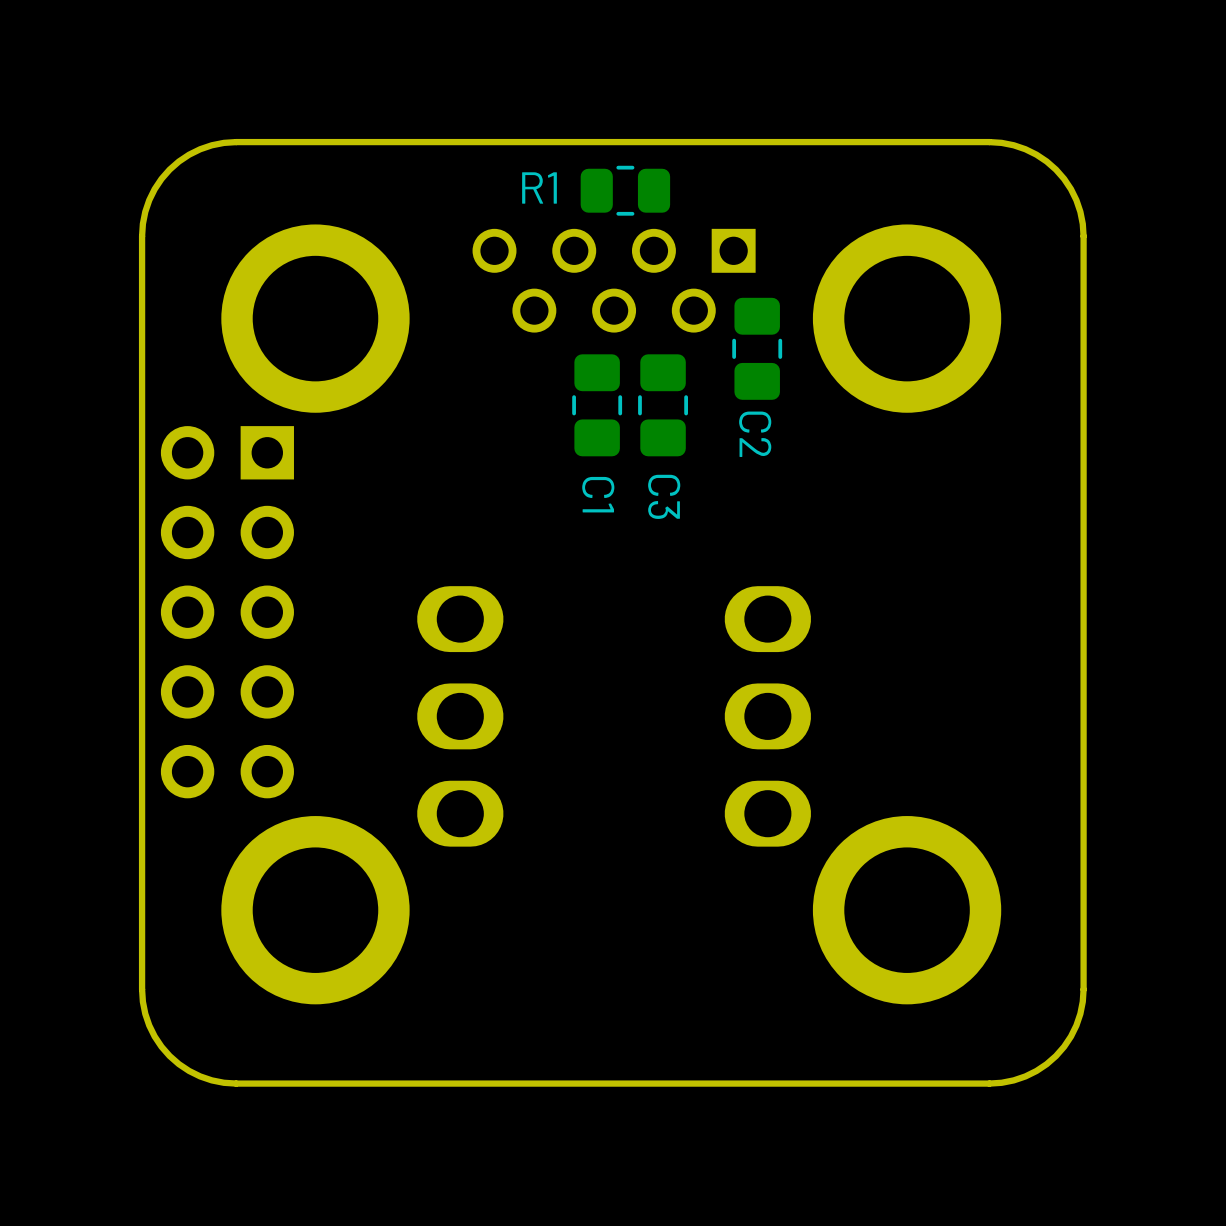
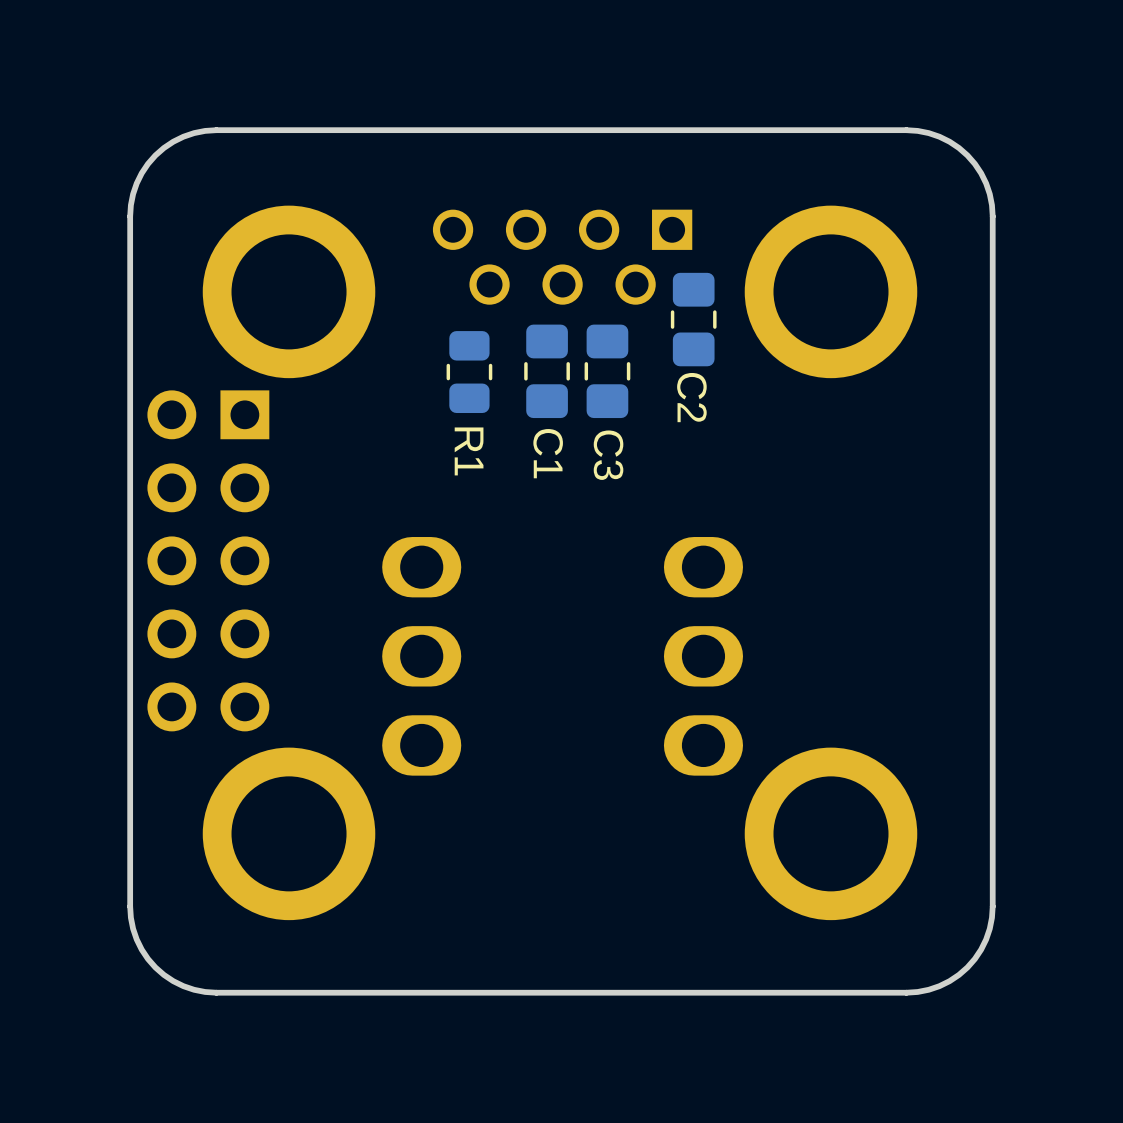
R1 name position: R1 (539, 187) -> R1 (469, 451)
R1 rotation: 0° (625, 190) -> 90° clockwise (469, 372)
R1 position: (625, 190) -> (469, 372)

